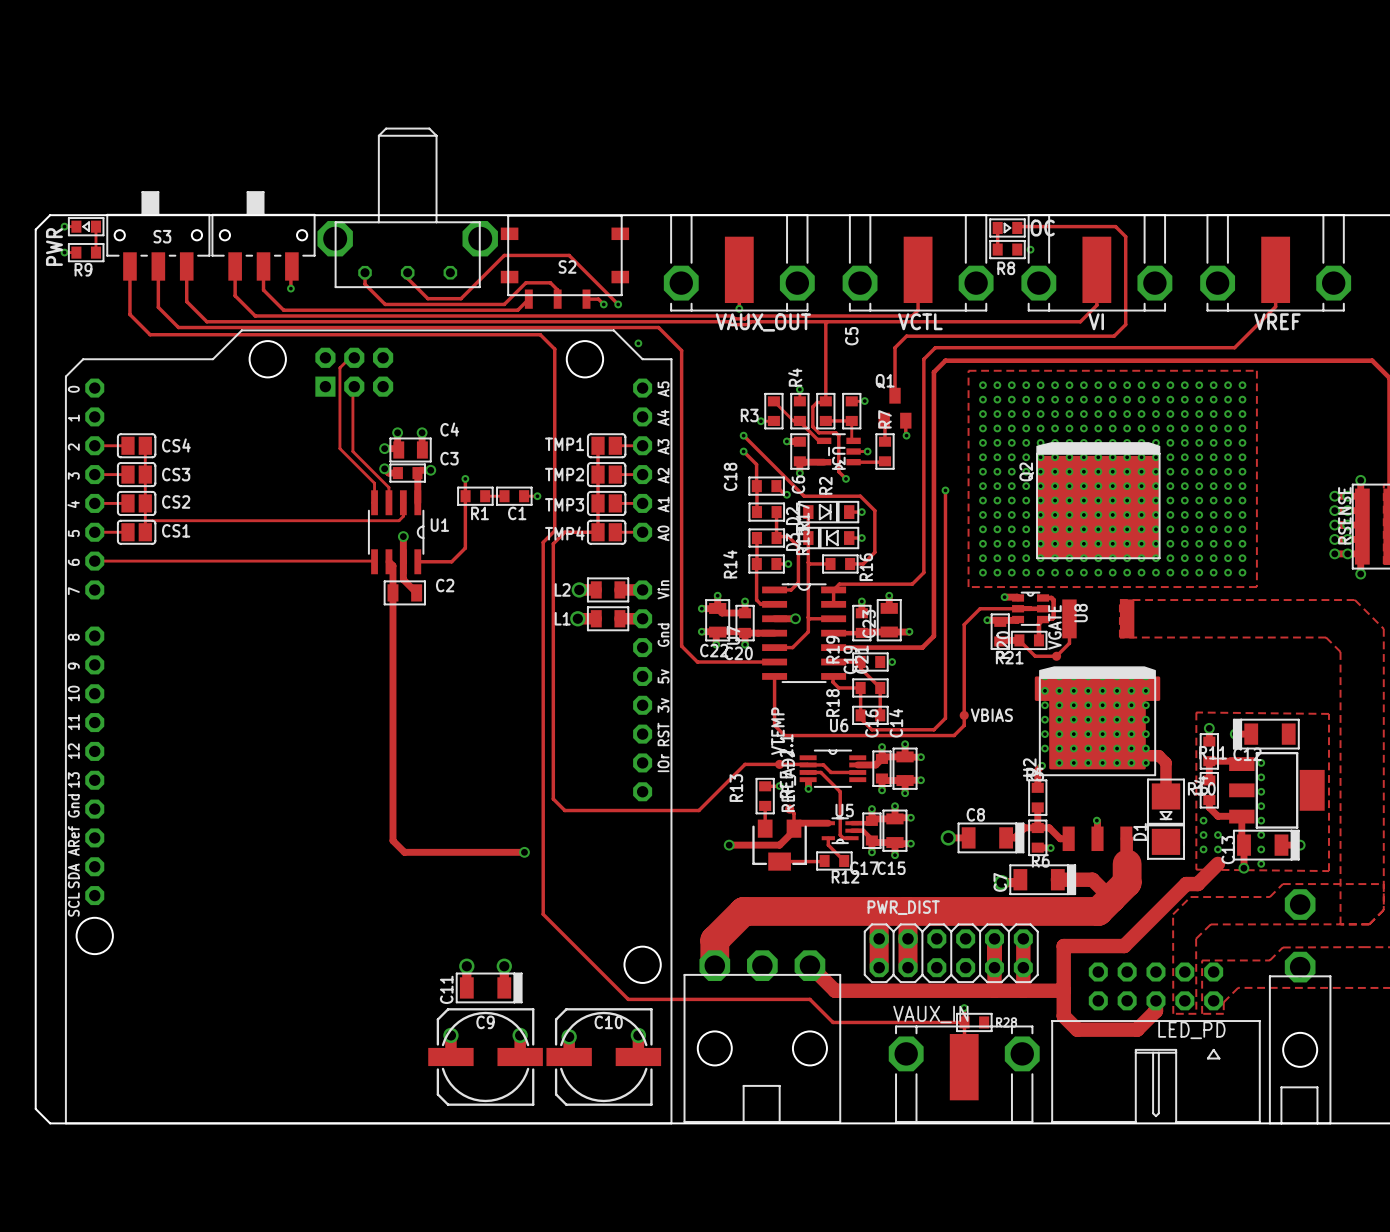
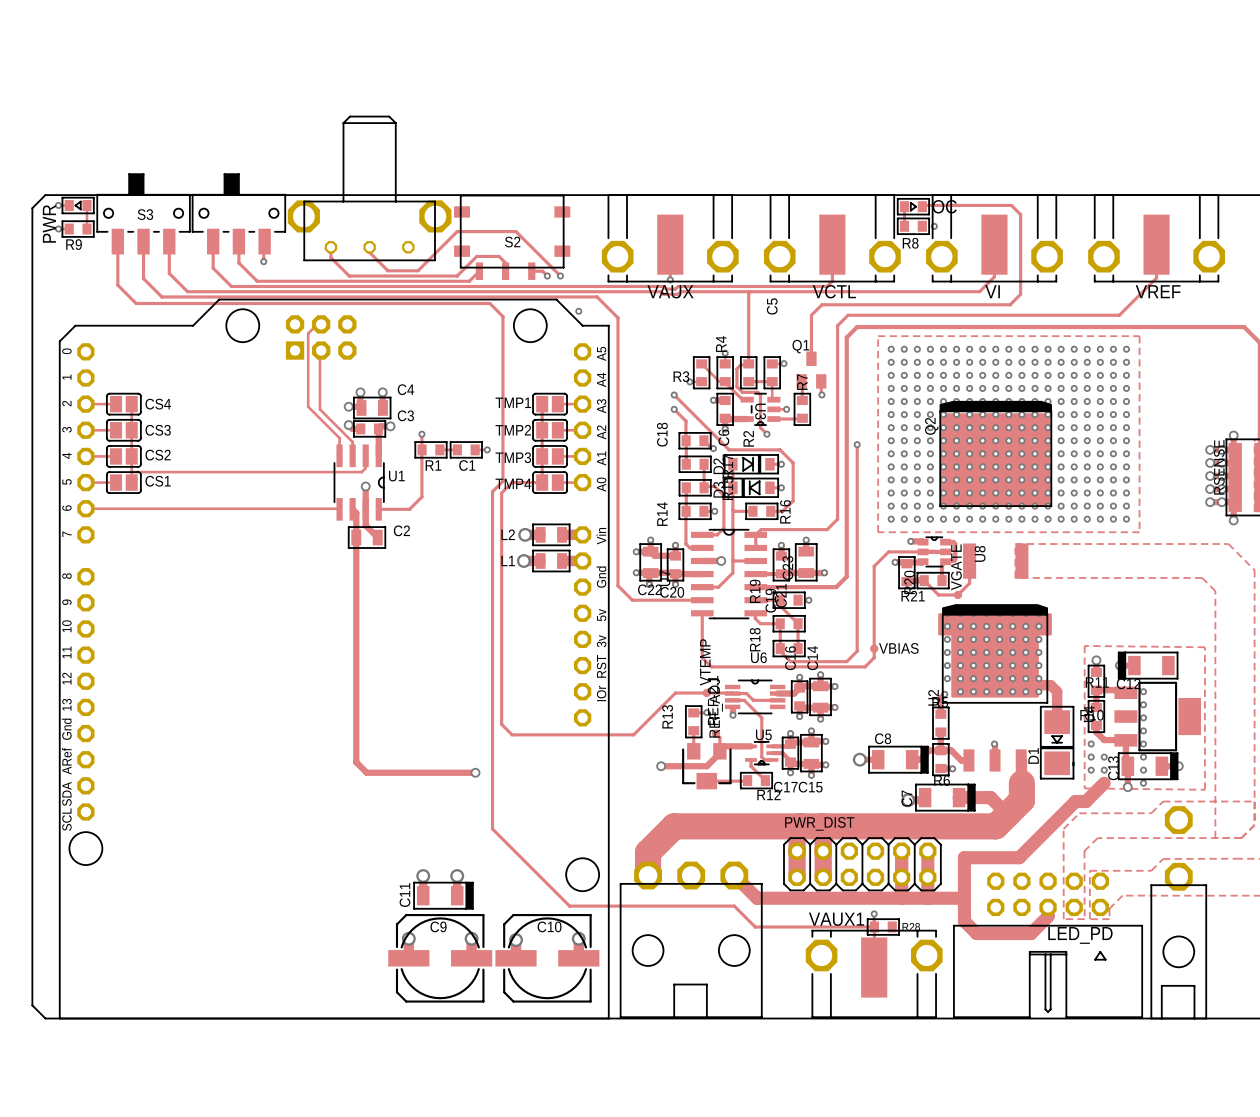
VAUX_OUT name: VAUX_OUT (763, 322) -> VAUX (670, 291)
VAUX_IN name: VAUX_IN (930, 1014) -> VAUX1 (836, 919)

